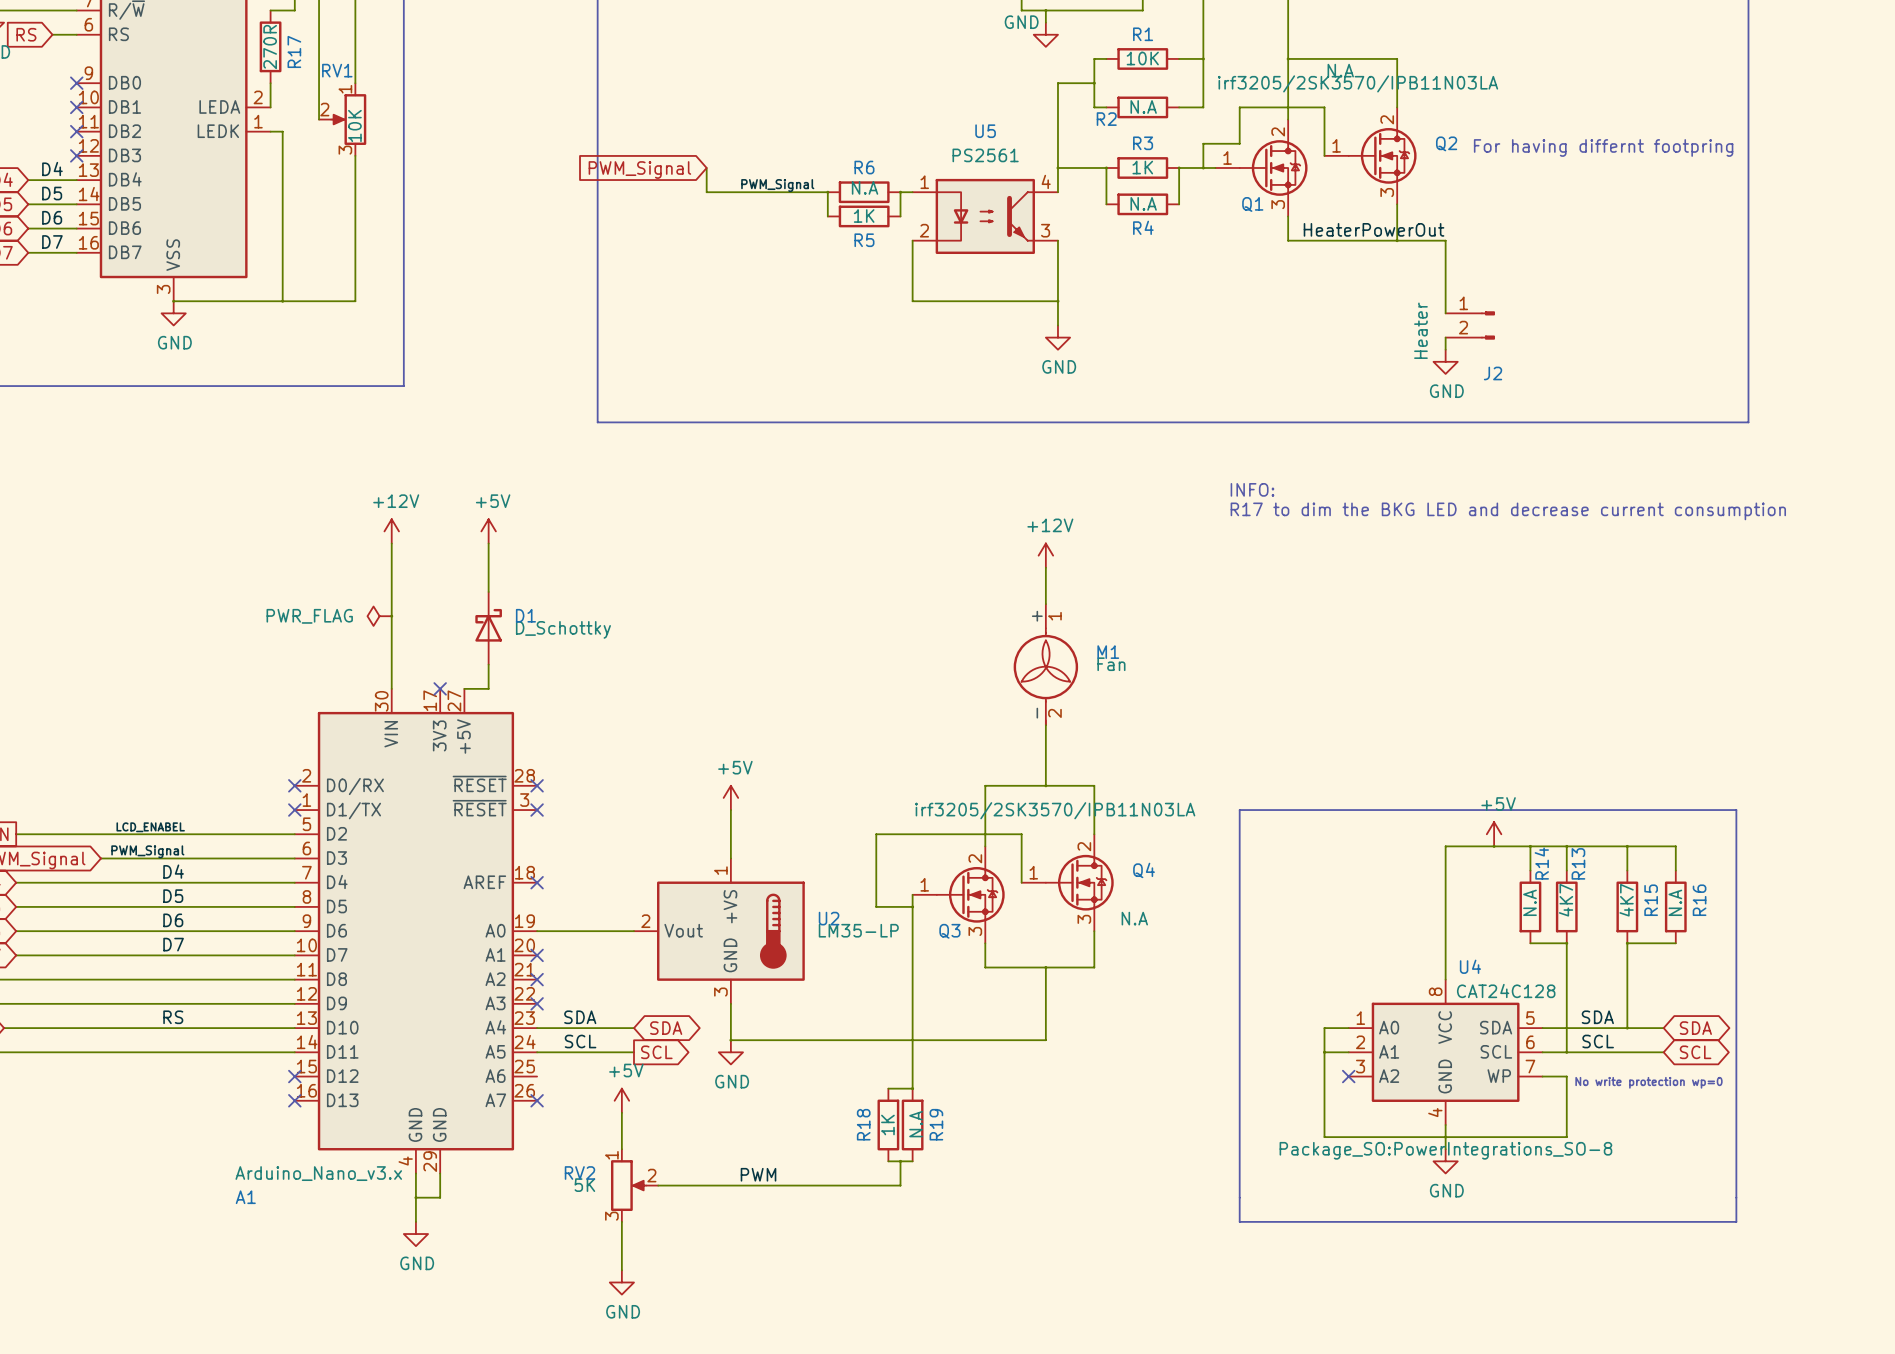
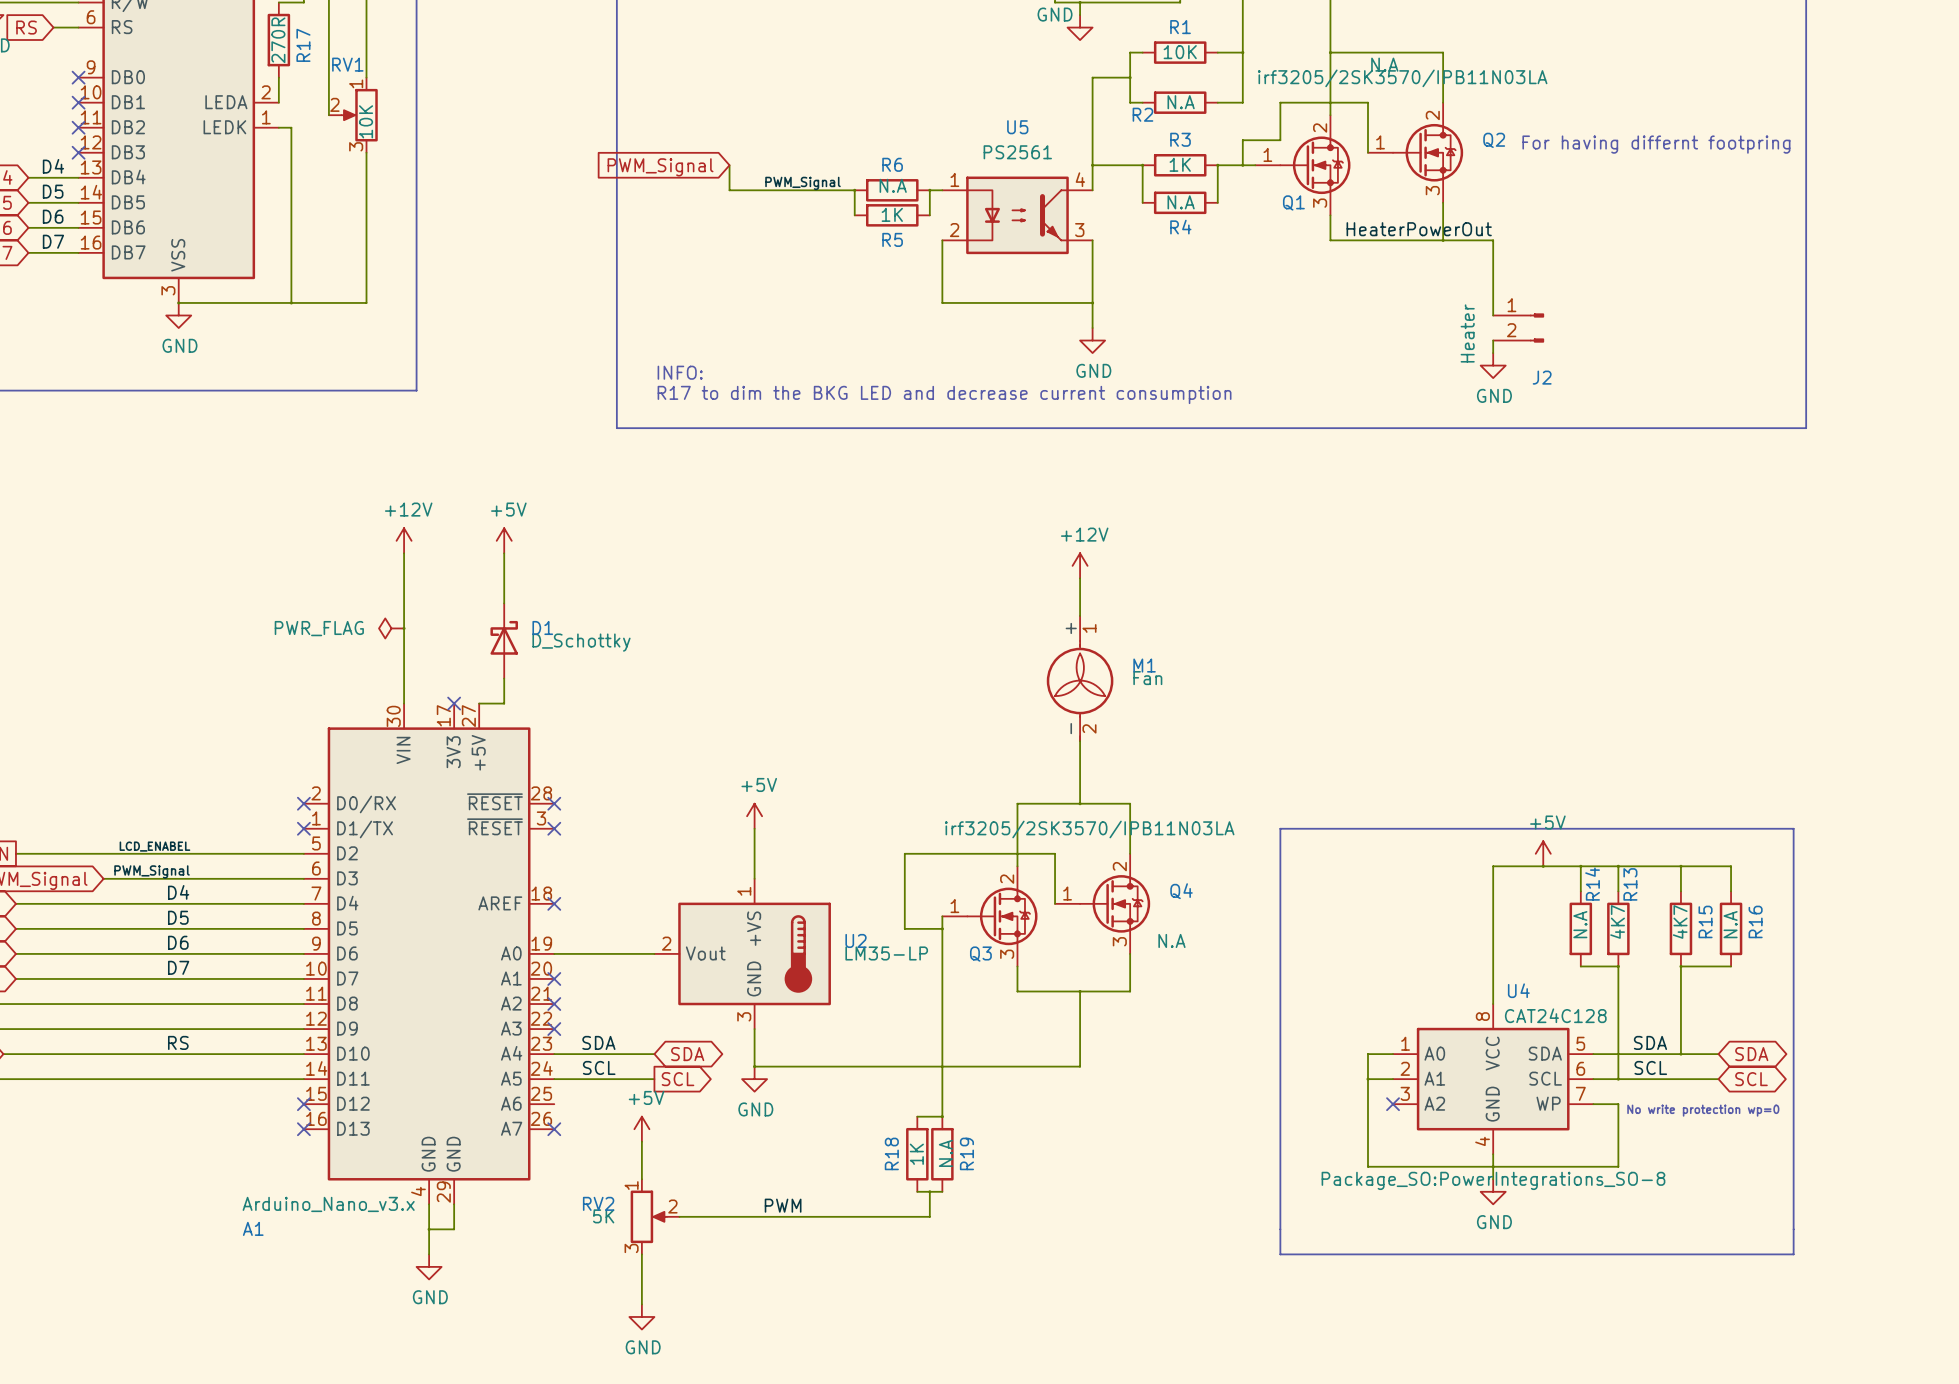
text: none -> INFO: (680, 372)
text: none -> R17 to dim the BKG LED and decrease current consumption (944, 394)
text: INFO: (1252, 489) -> none
text: R17 to dim the BKG LED and decrease current consumption (1508, 511) -> none

